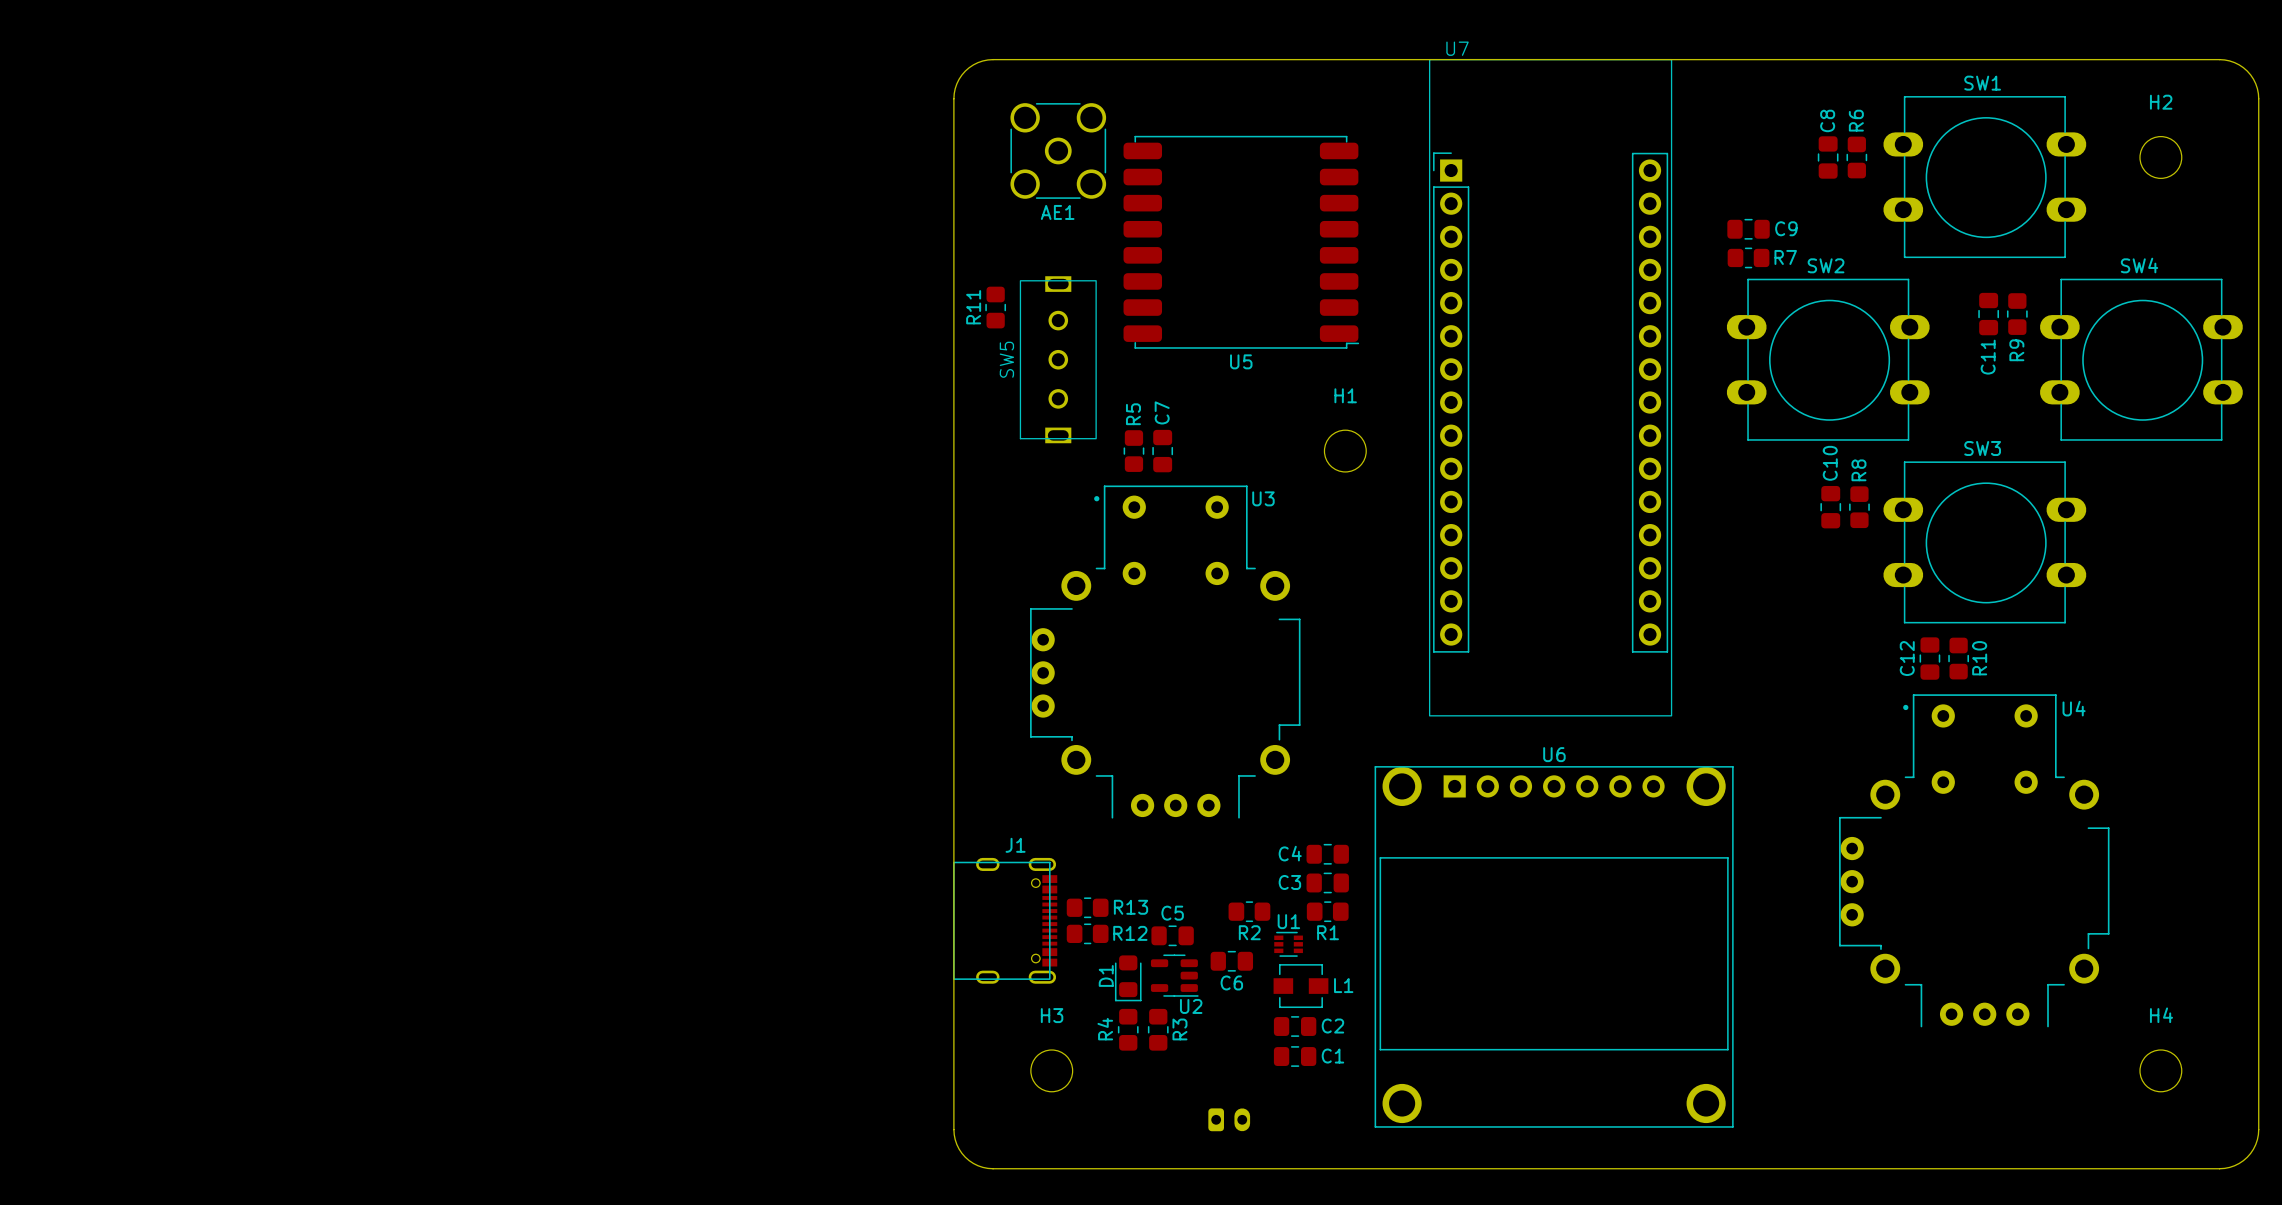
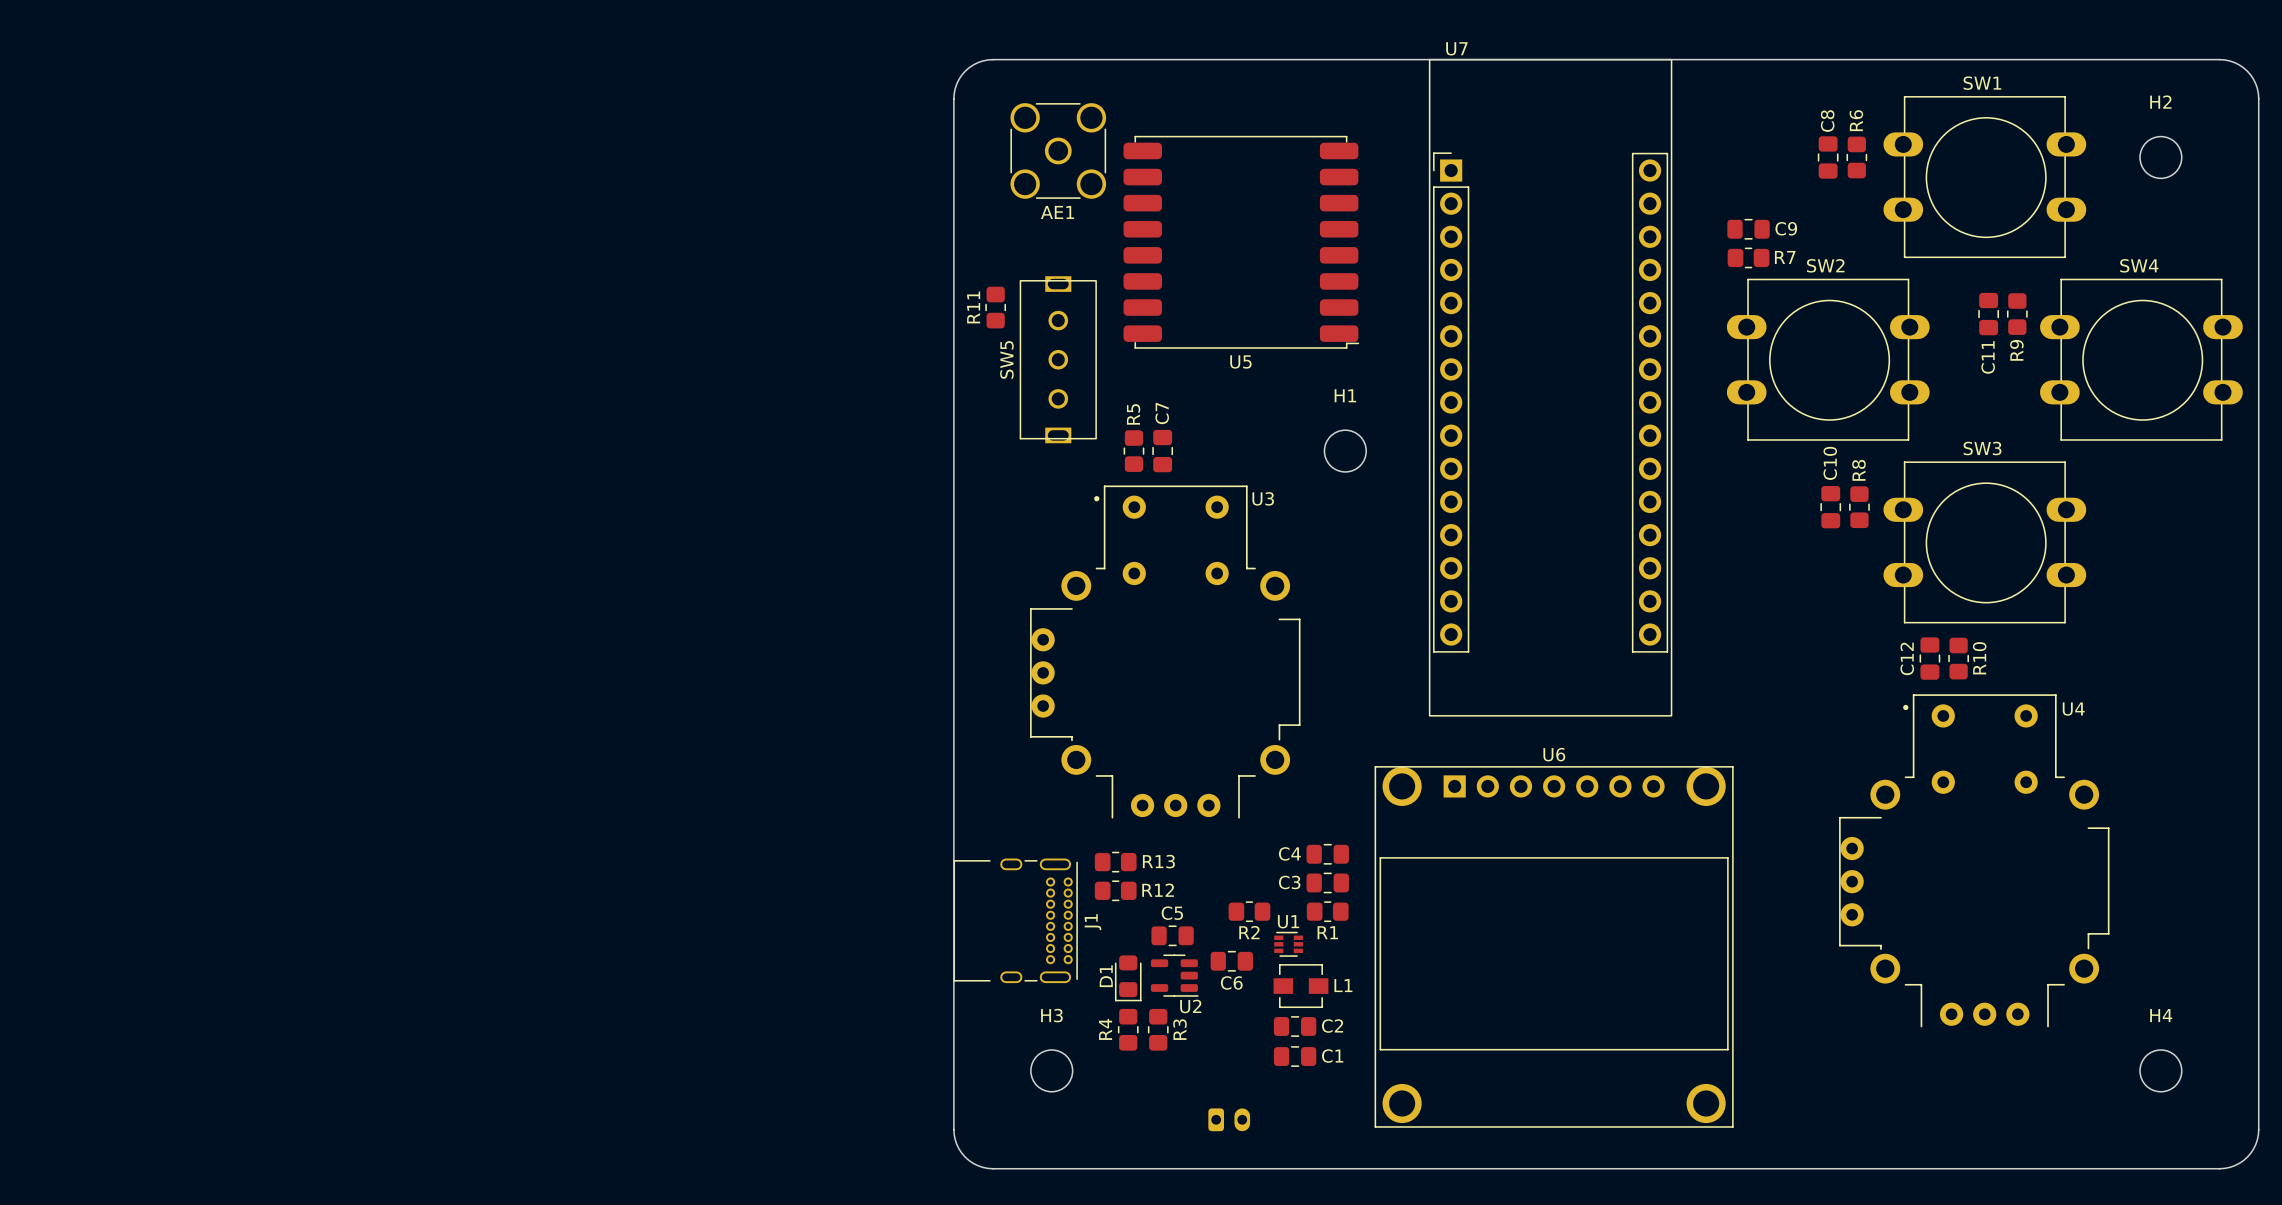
J1 name position: J1 (1015, 845) -> J1 (1092, 922)
J1 footprint: [953, 857, 1058, 984] -> [953, 858, 1078, 984]
R13 position: (1087, 907) -> (1115, 862)
R12 position: (1087, 933) -> (1115, 890)

